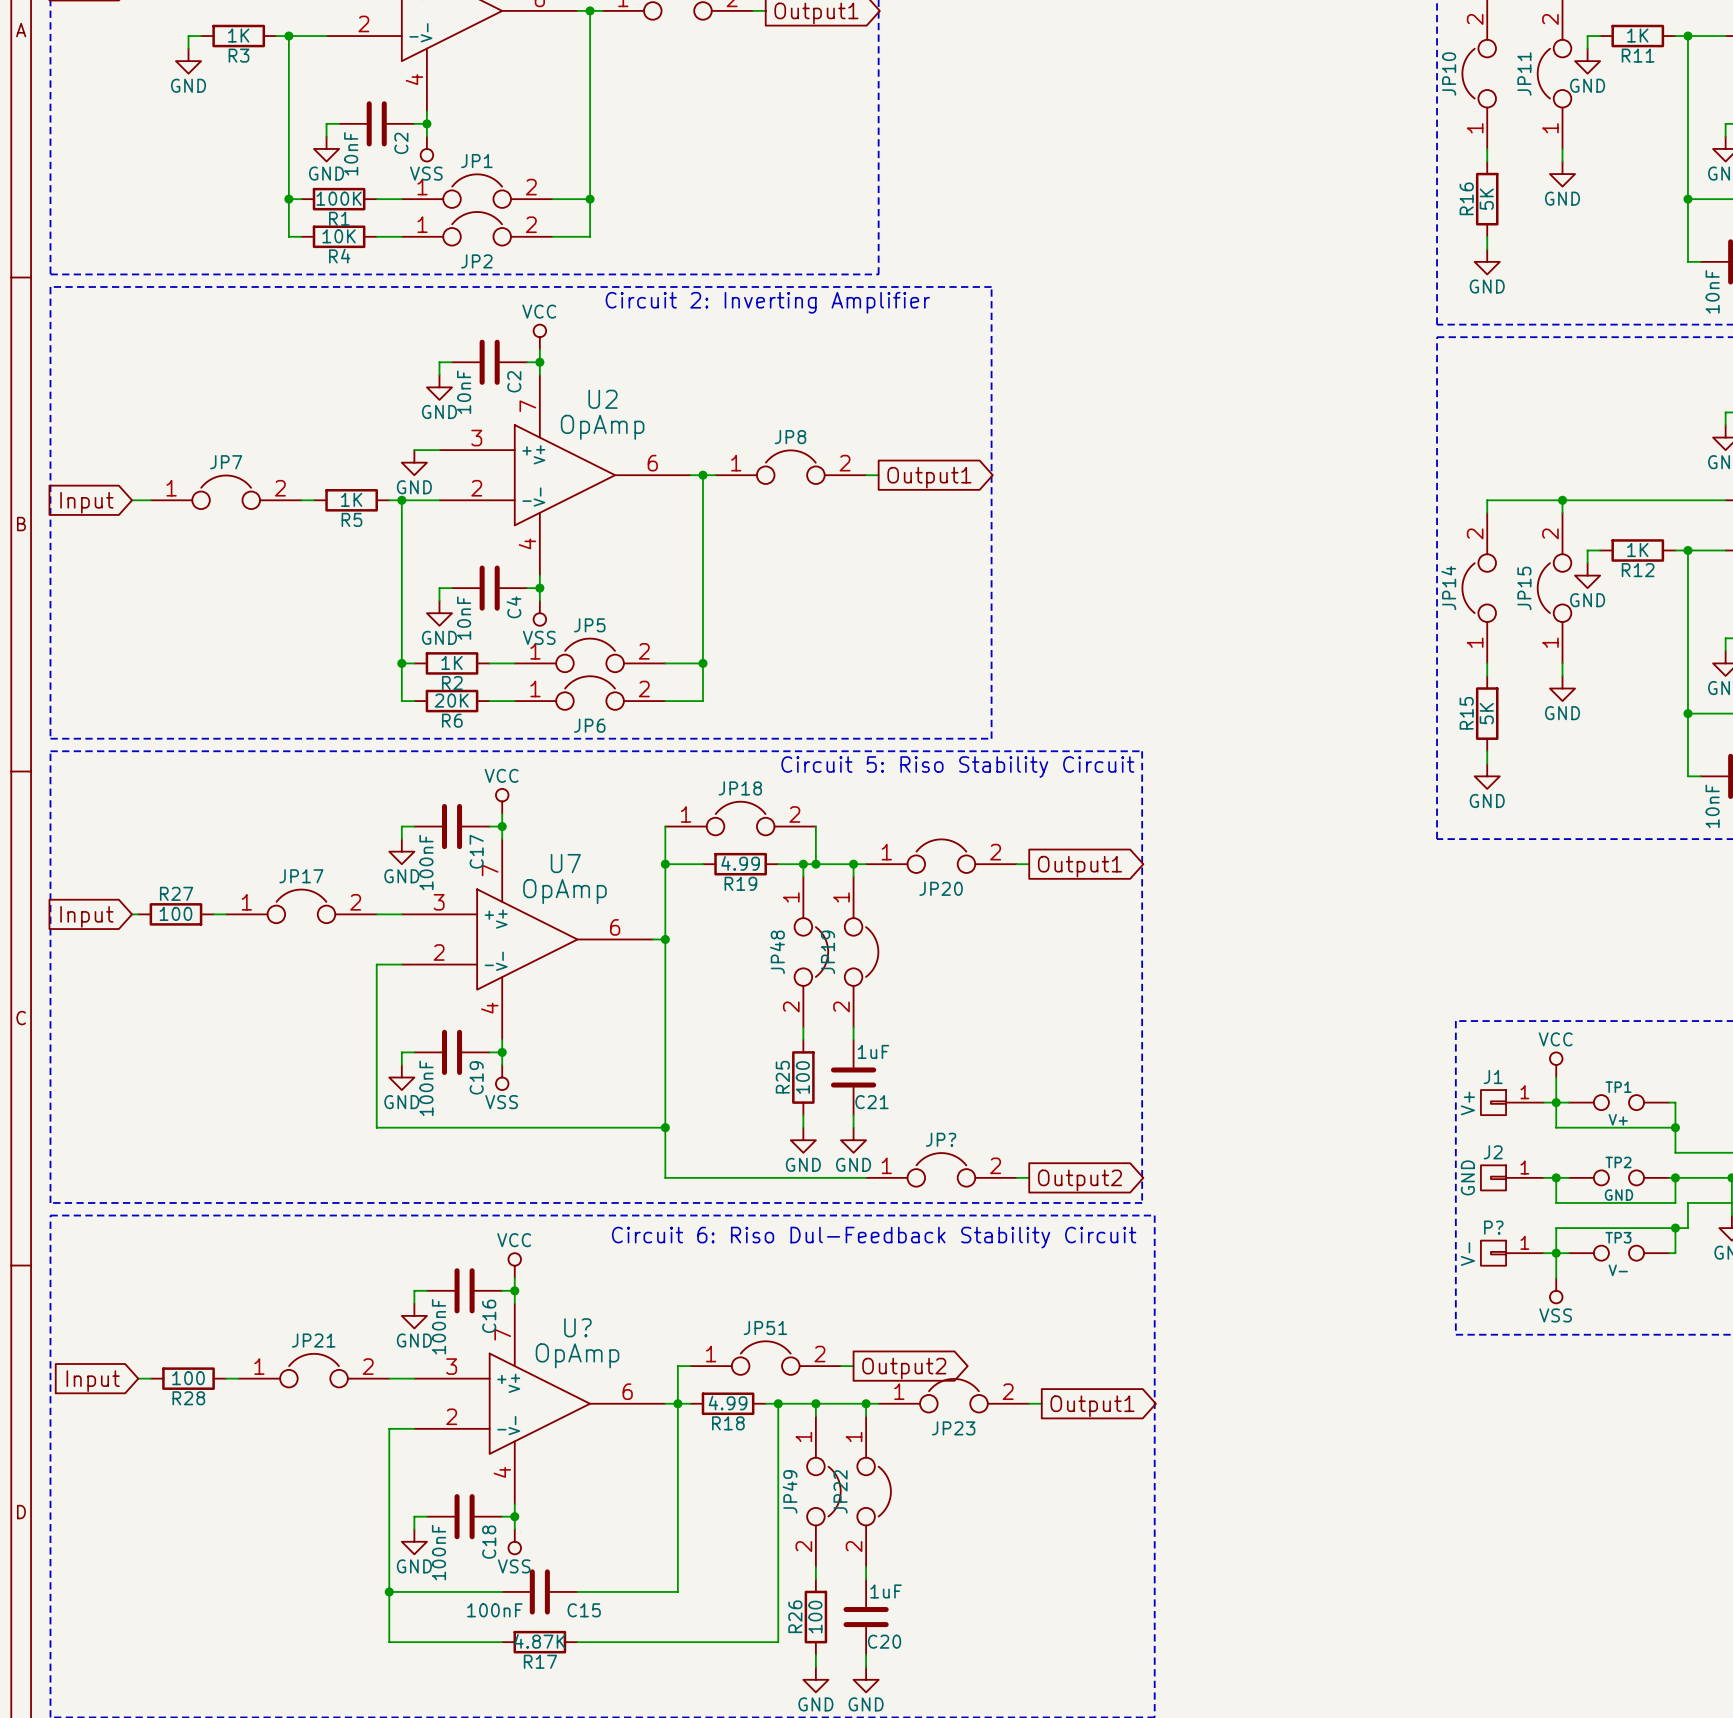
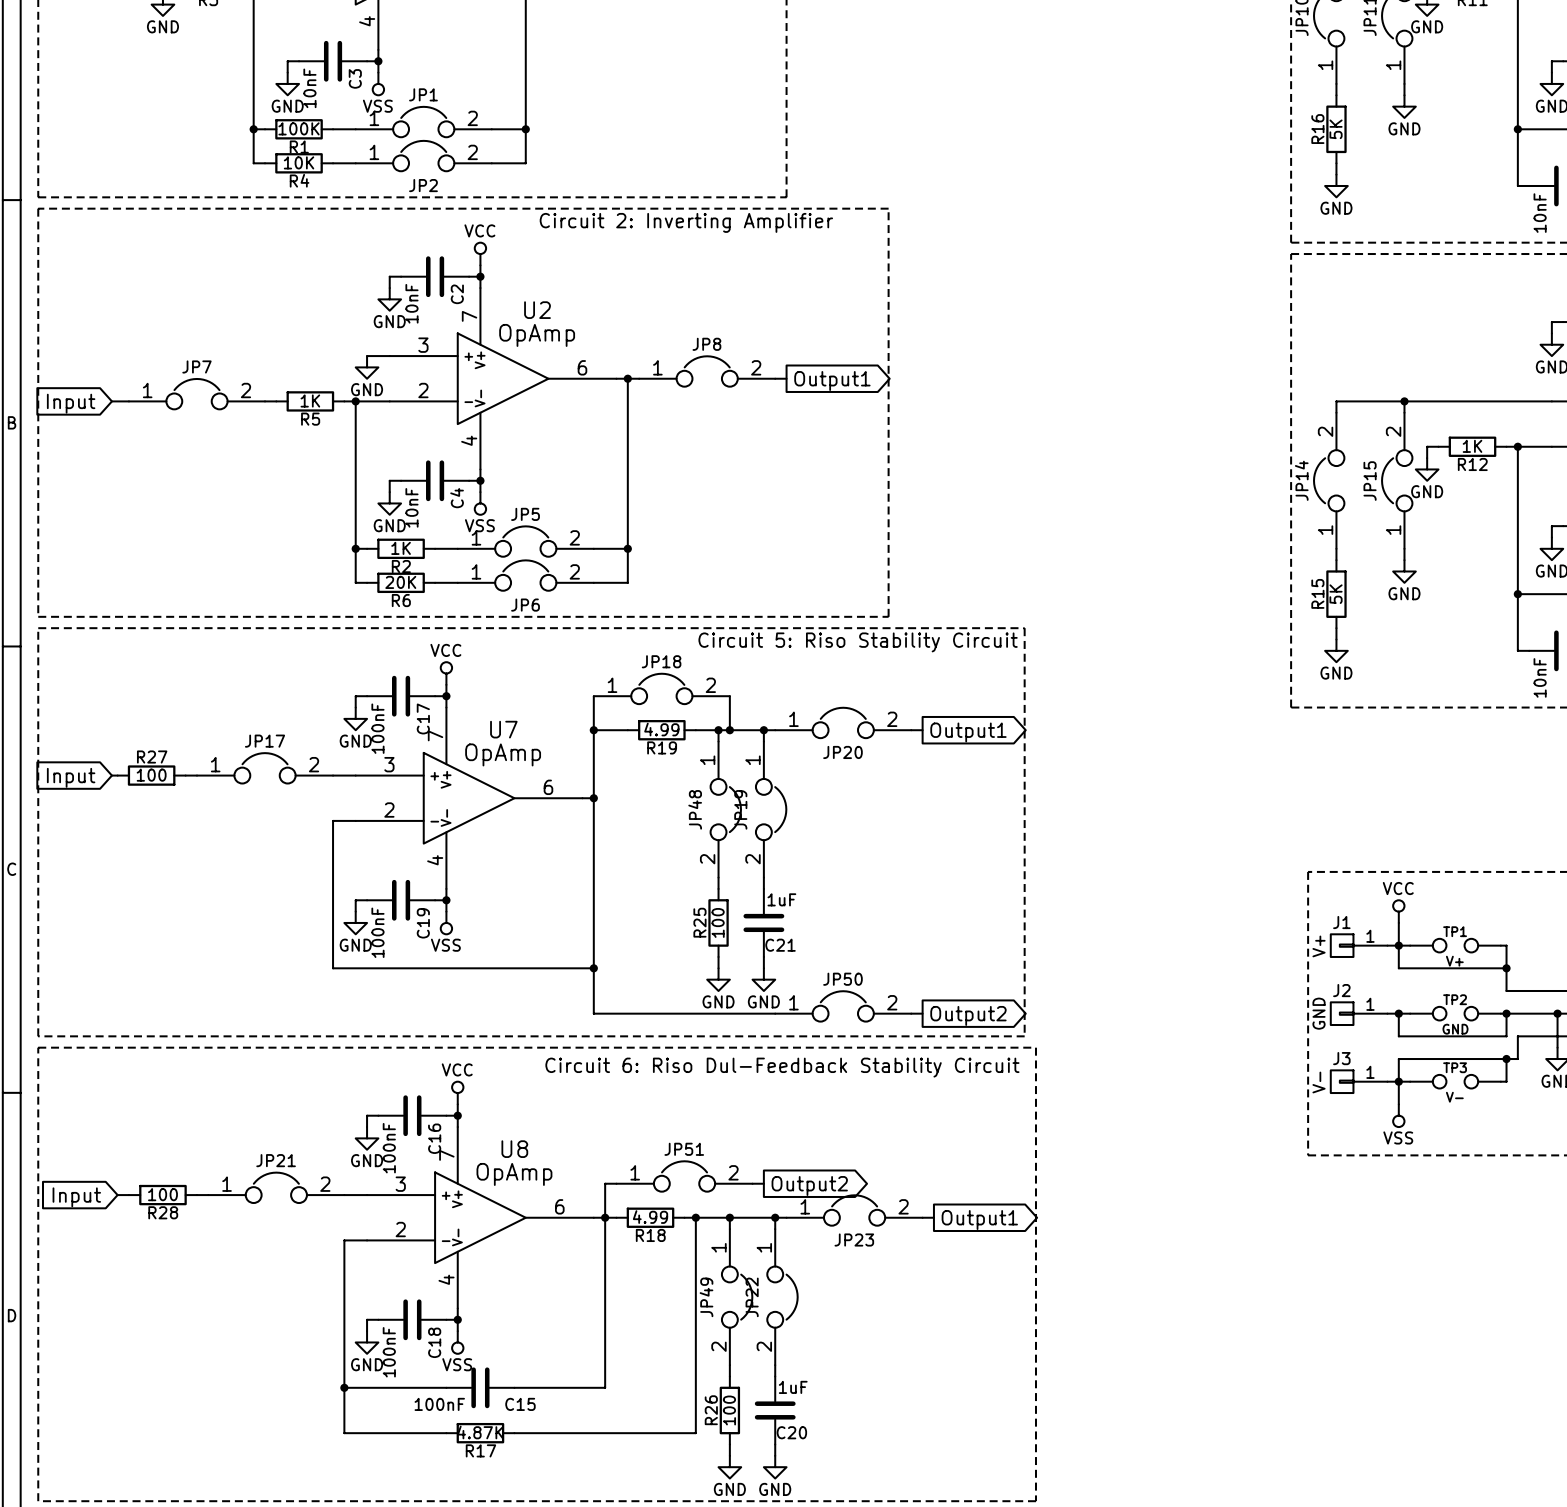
C2 name: C2 (401, 143) -> C3 (355, 78)
JP? name: JP? (941, 1139) -> JP50 (842, 979)
P? name: P? (1493, 1227) -> J3 (1341, 1058)
U? name: U? (577, 1327) -> U8 (514, 1149)

